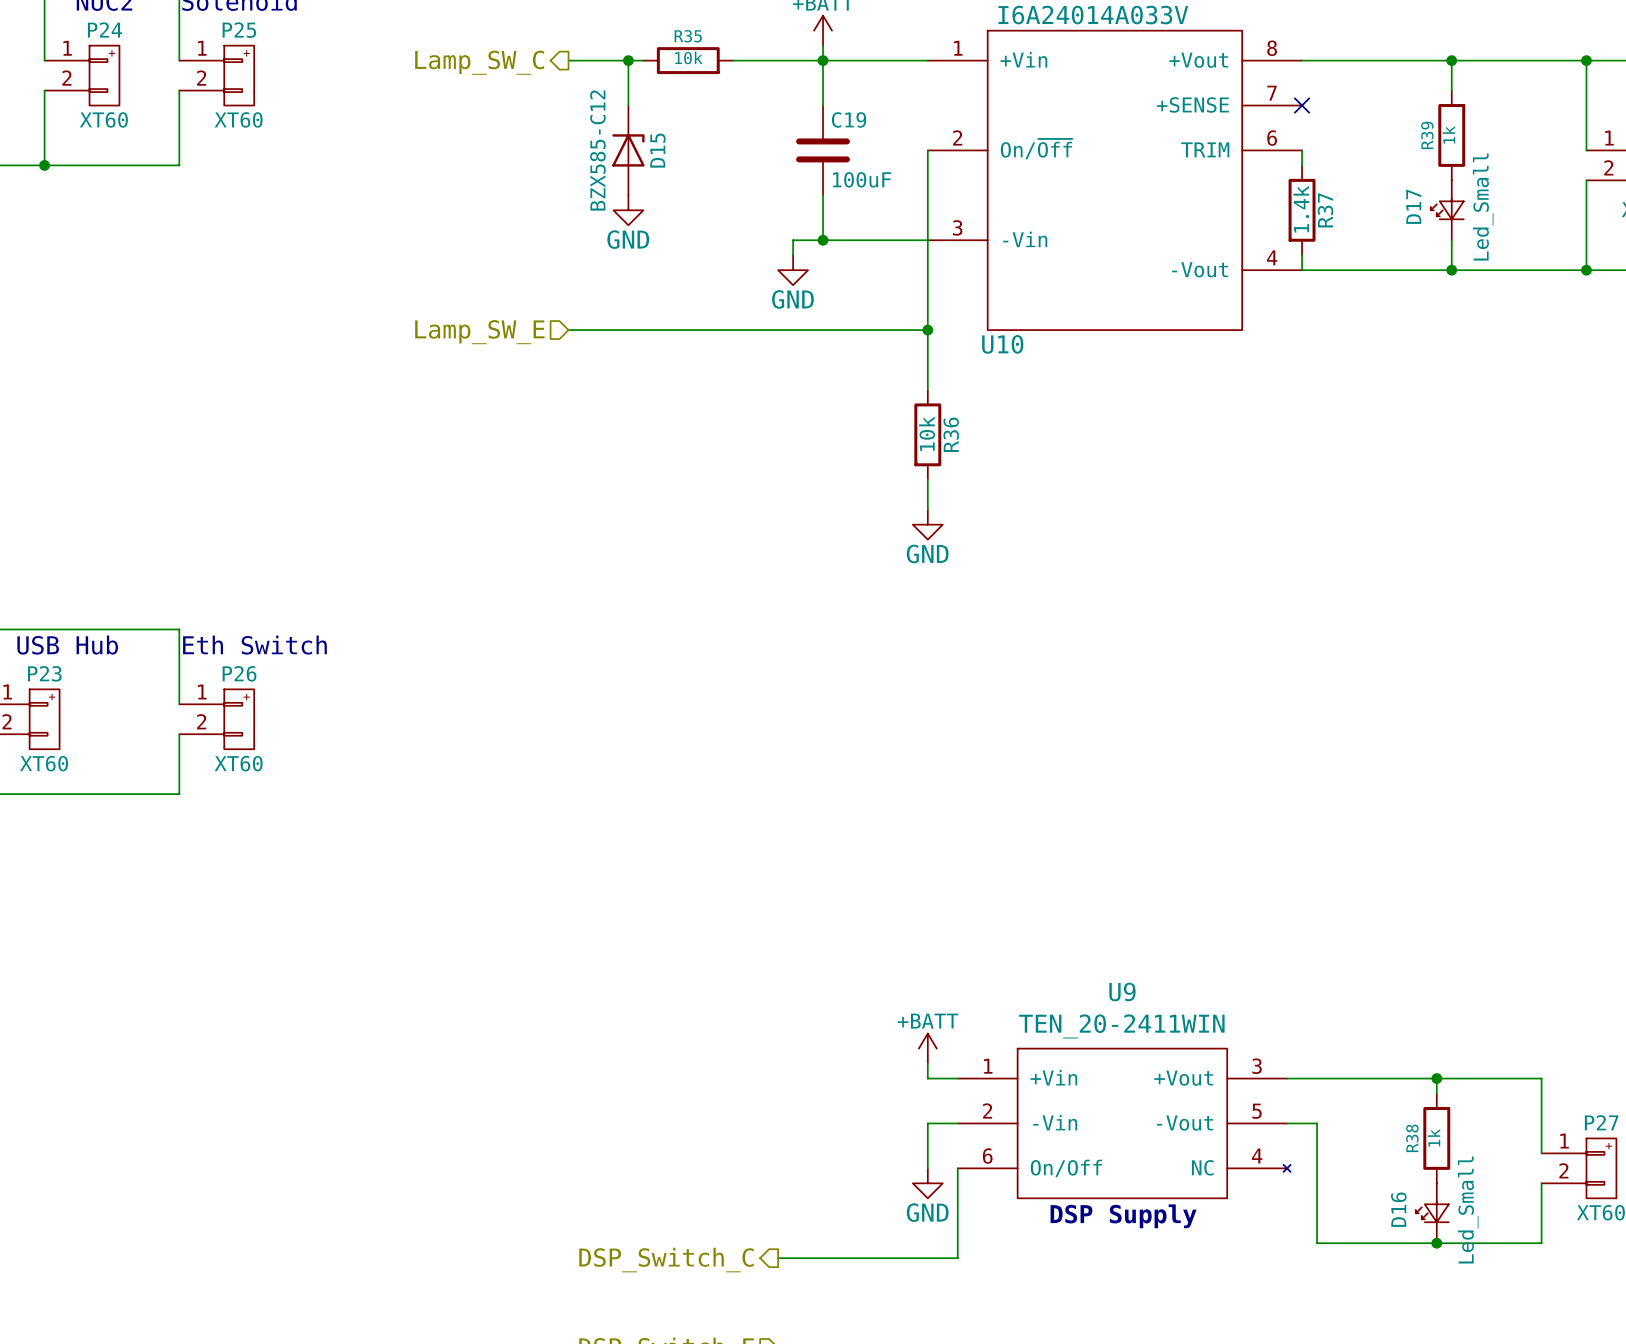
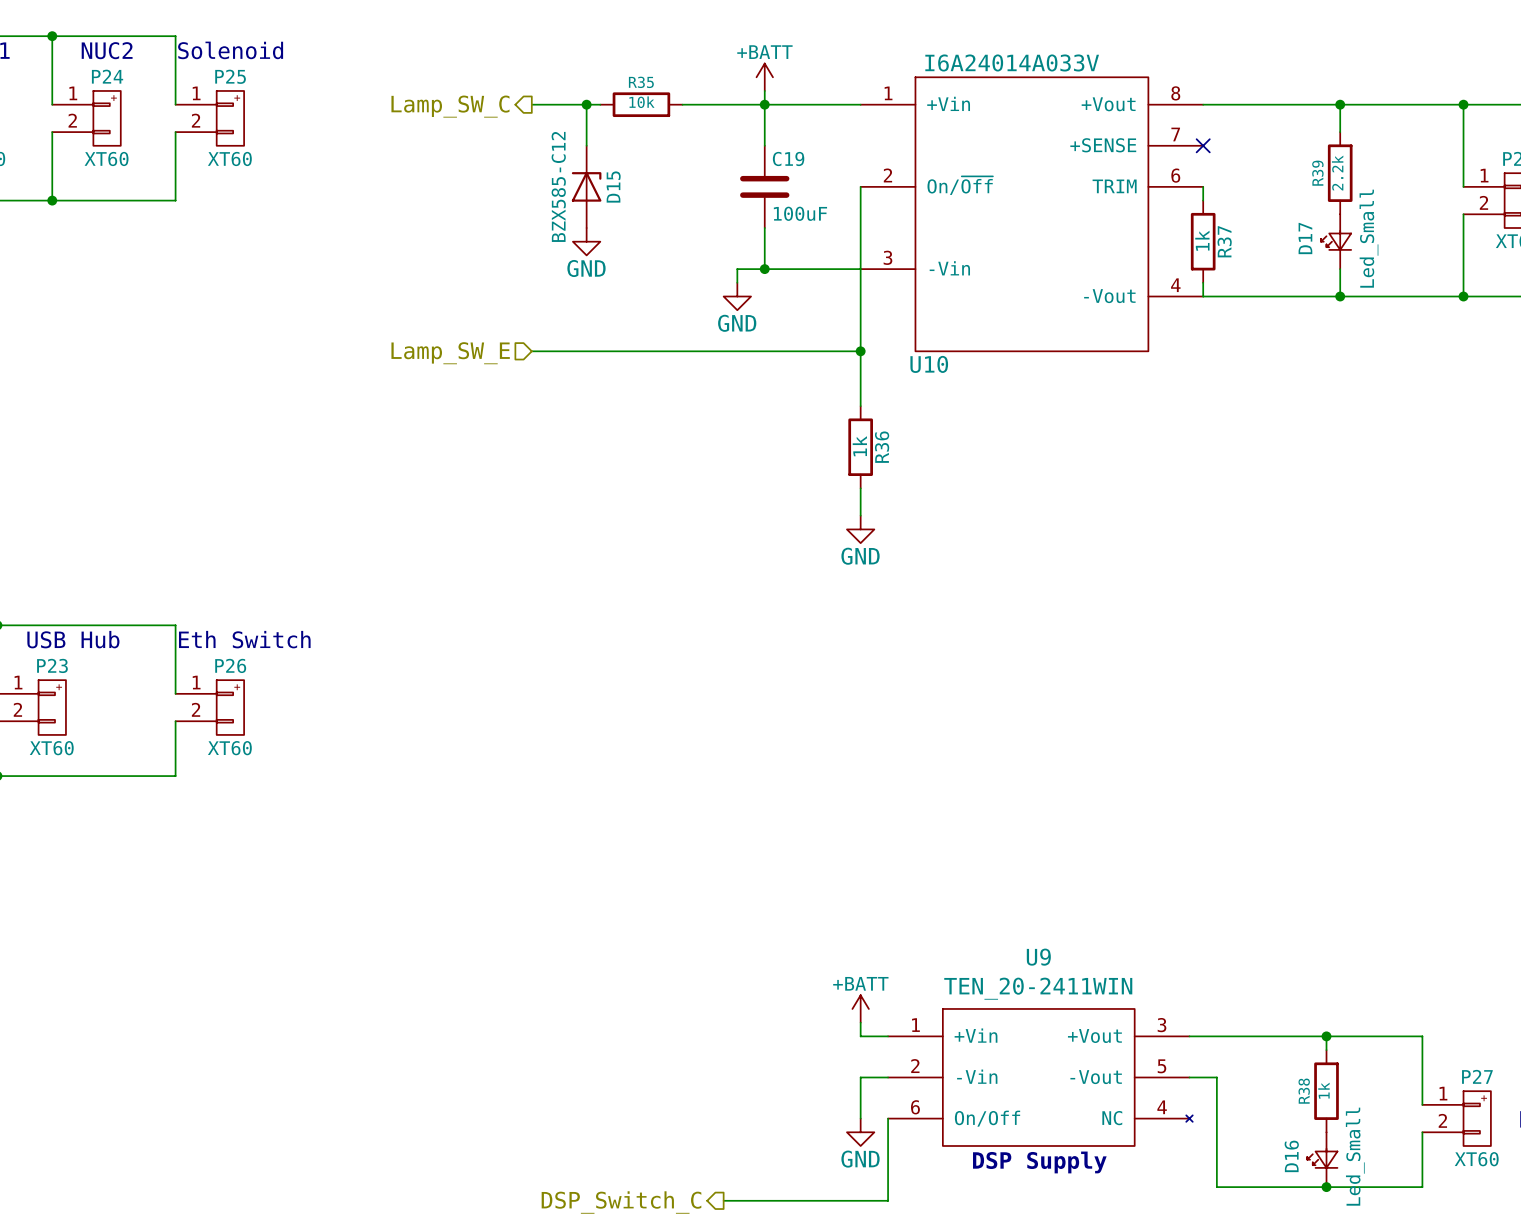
R39 value: 1k (1448, 134) -> 2.2k (1337, 173)
R37 value: 1.4k (1301, 209) -> 1k (1202, 240)
R36 value: 10k (927, 433) -> 1k (859, 446)

